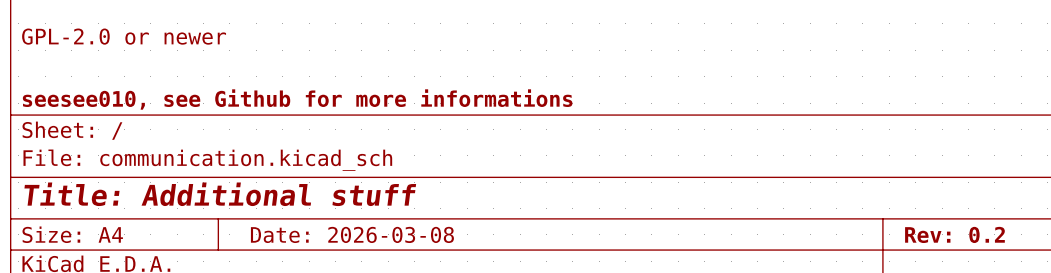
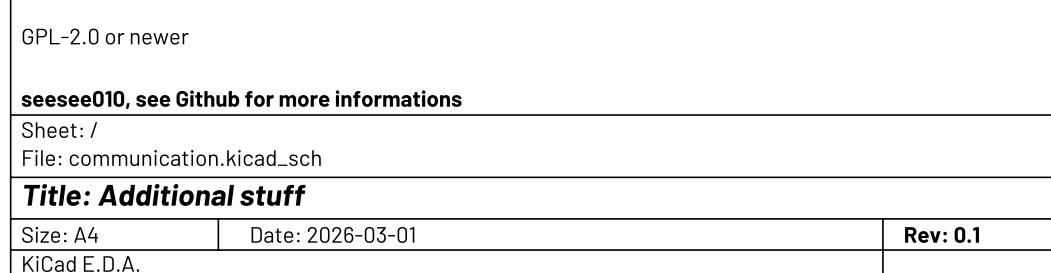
title block: Date: 2026-03-08 (352, 234) -> Date: 2026-03-01 (332, 234)
title block: Rev: 0.2 (954, 234) -> Rev: 0.1 (942, 234)

